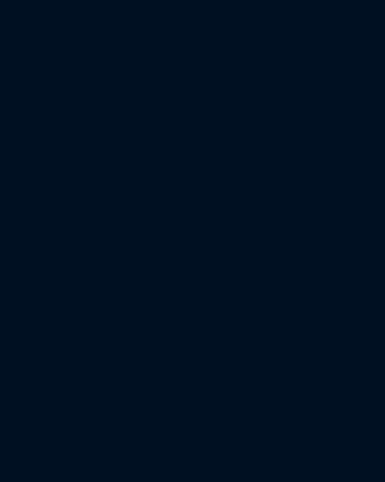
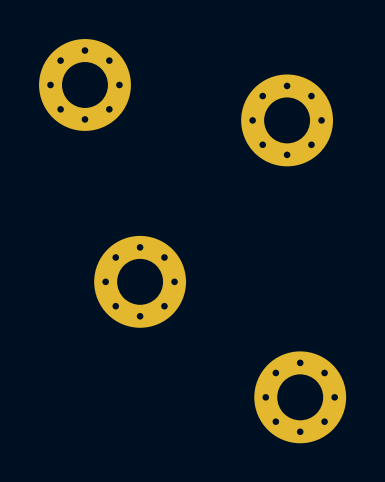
part: none -> (84, 84)
part: none -> (287, 120)
part: none -> (140, 281)
part: none -> (300, 397)

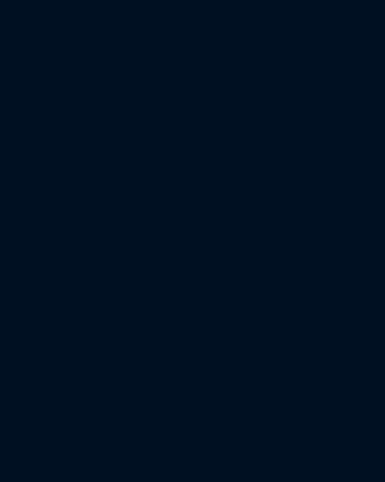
part: (84, 84) -> none
part: (287, 120) -> none
part: (140, 281) -> none
part: (300, 397) -> none

